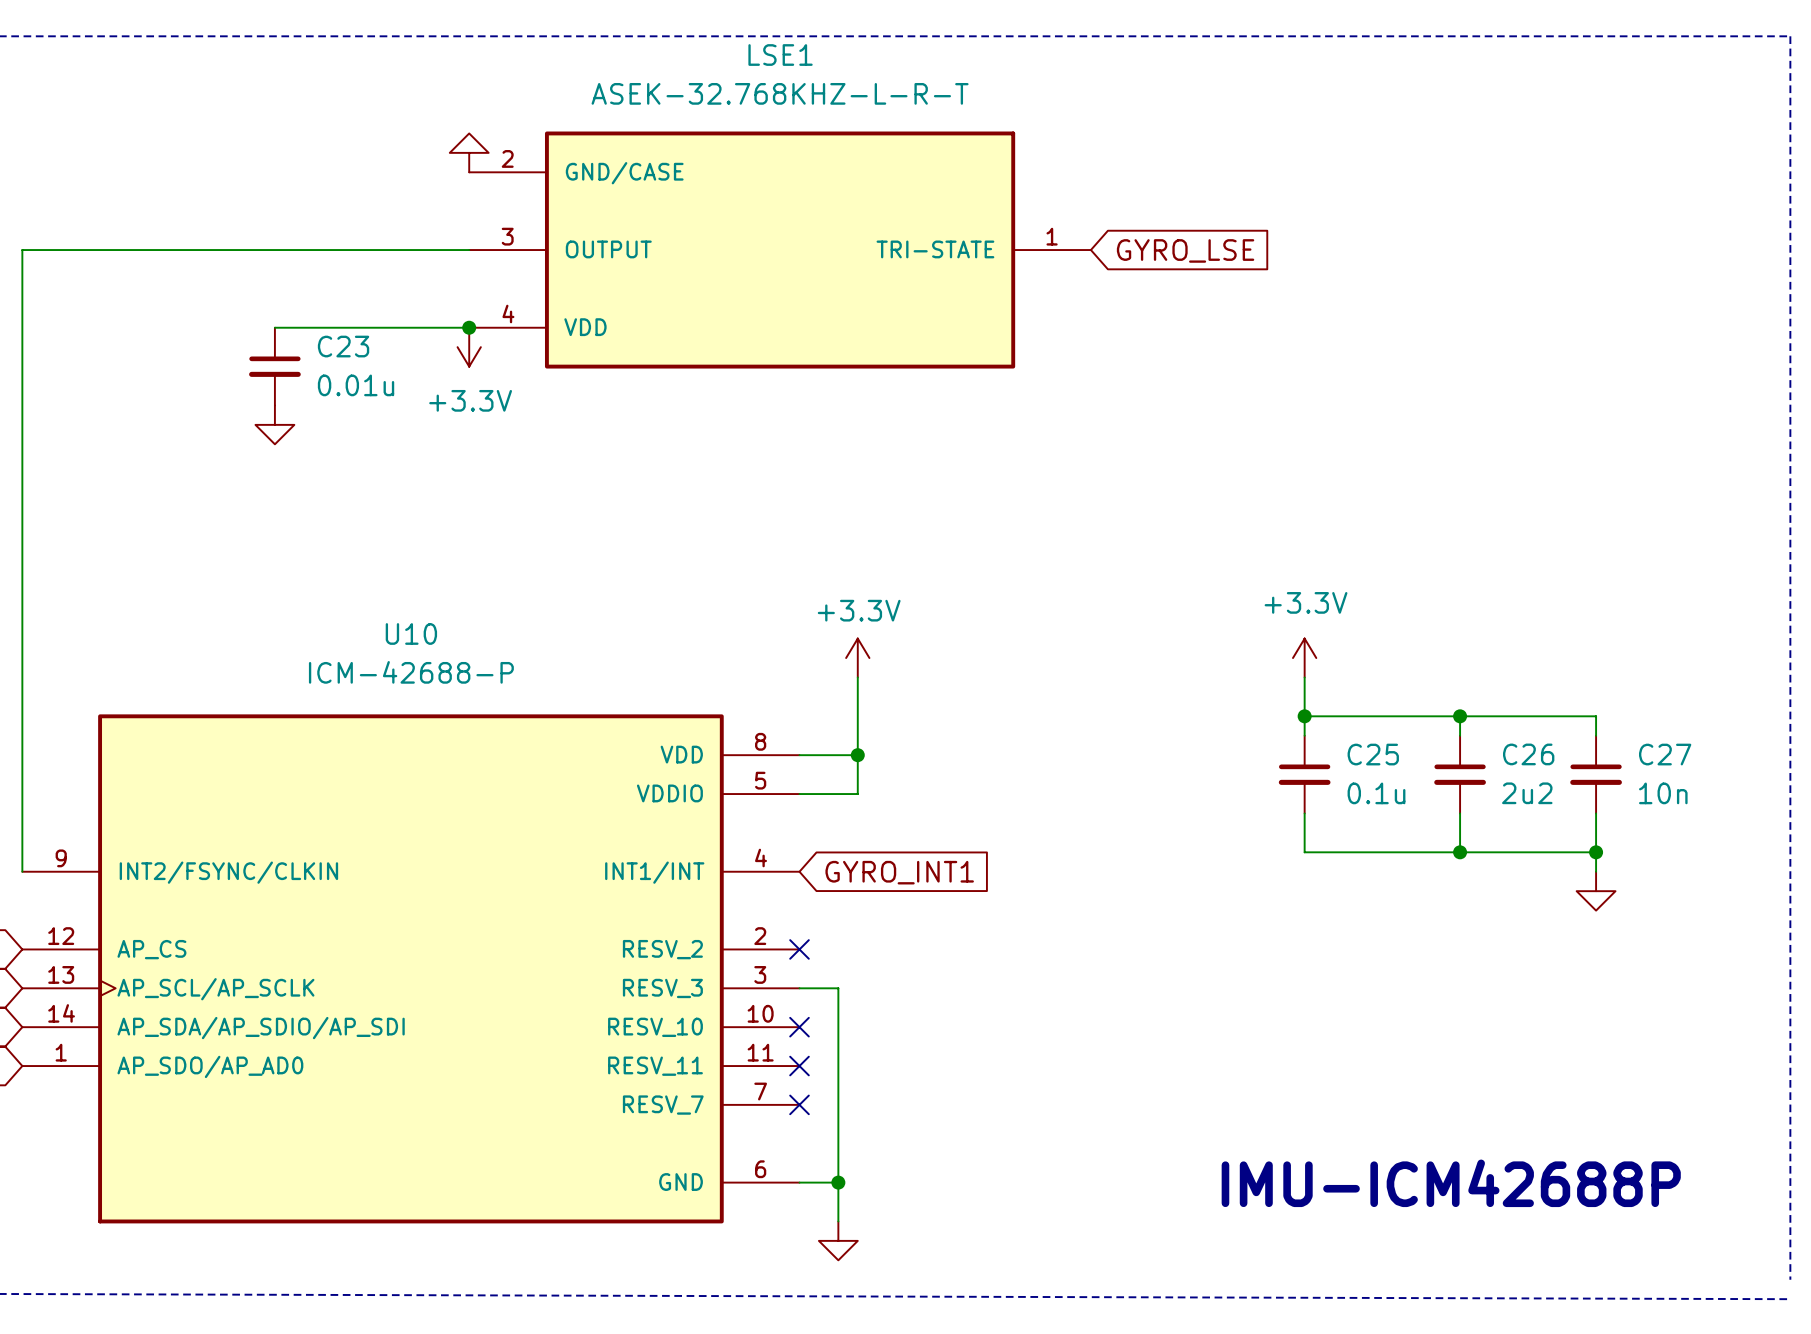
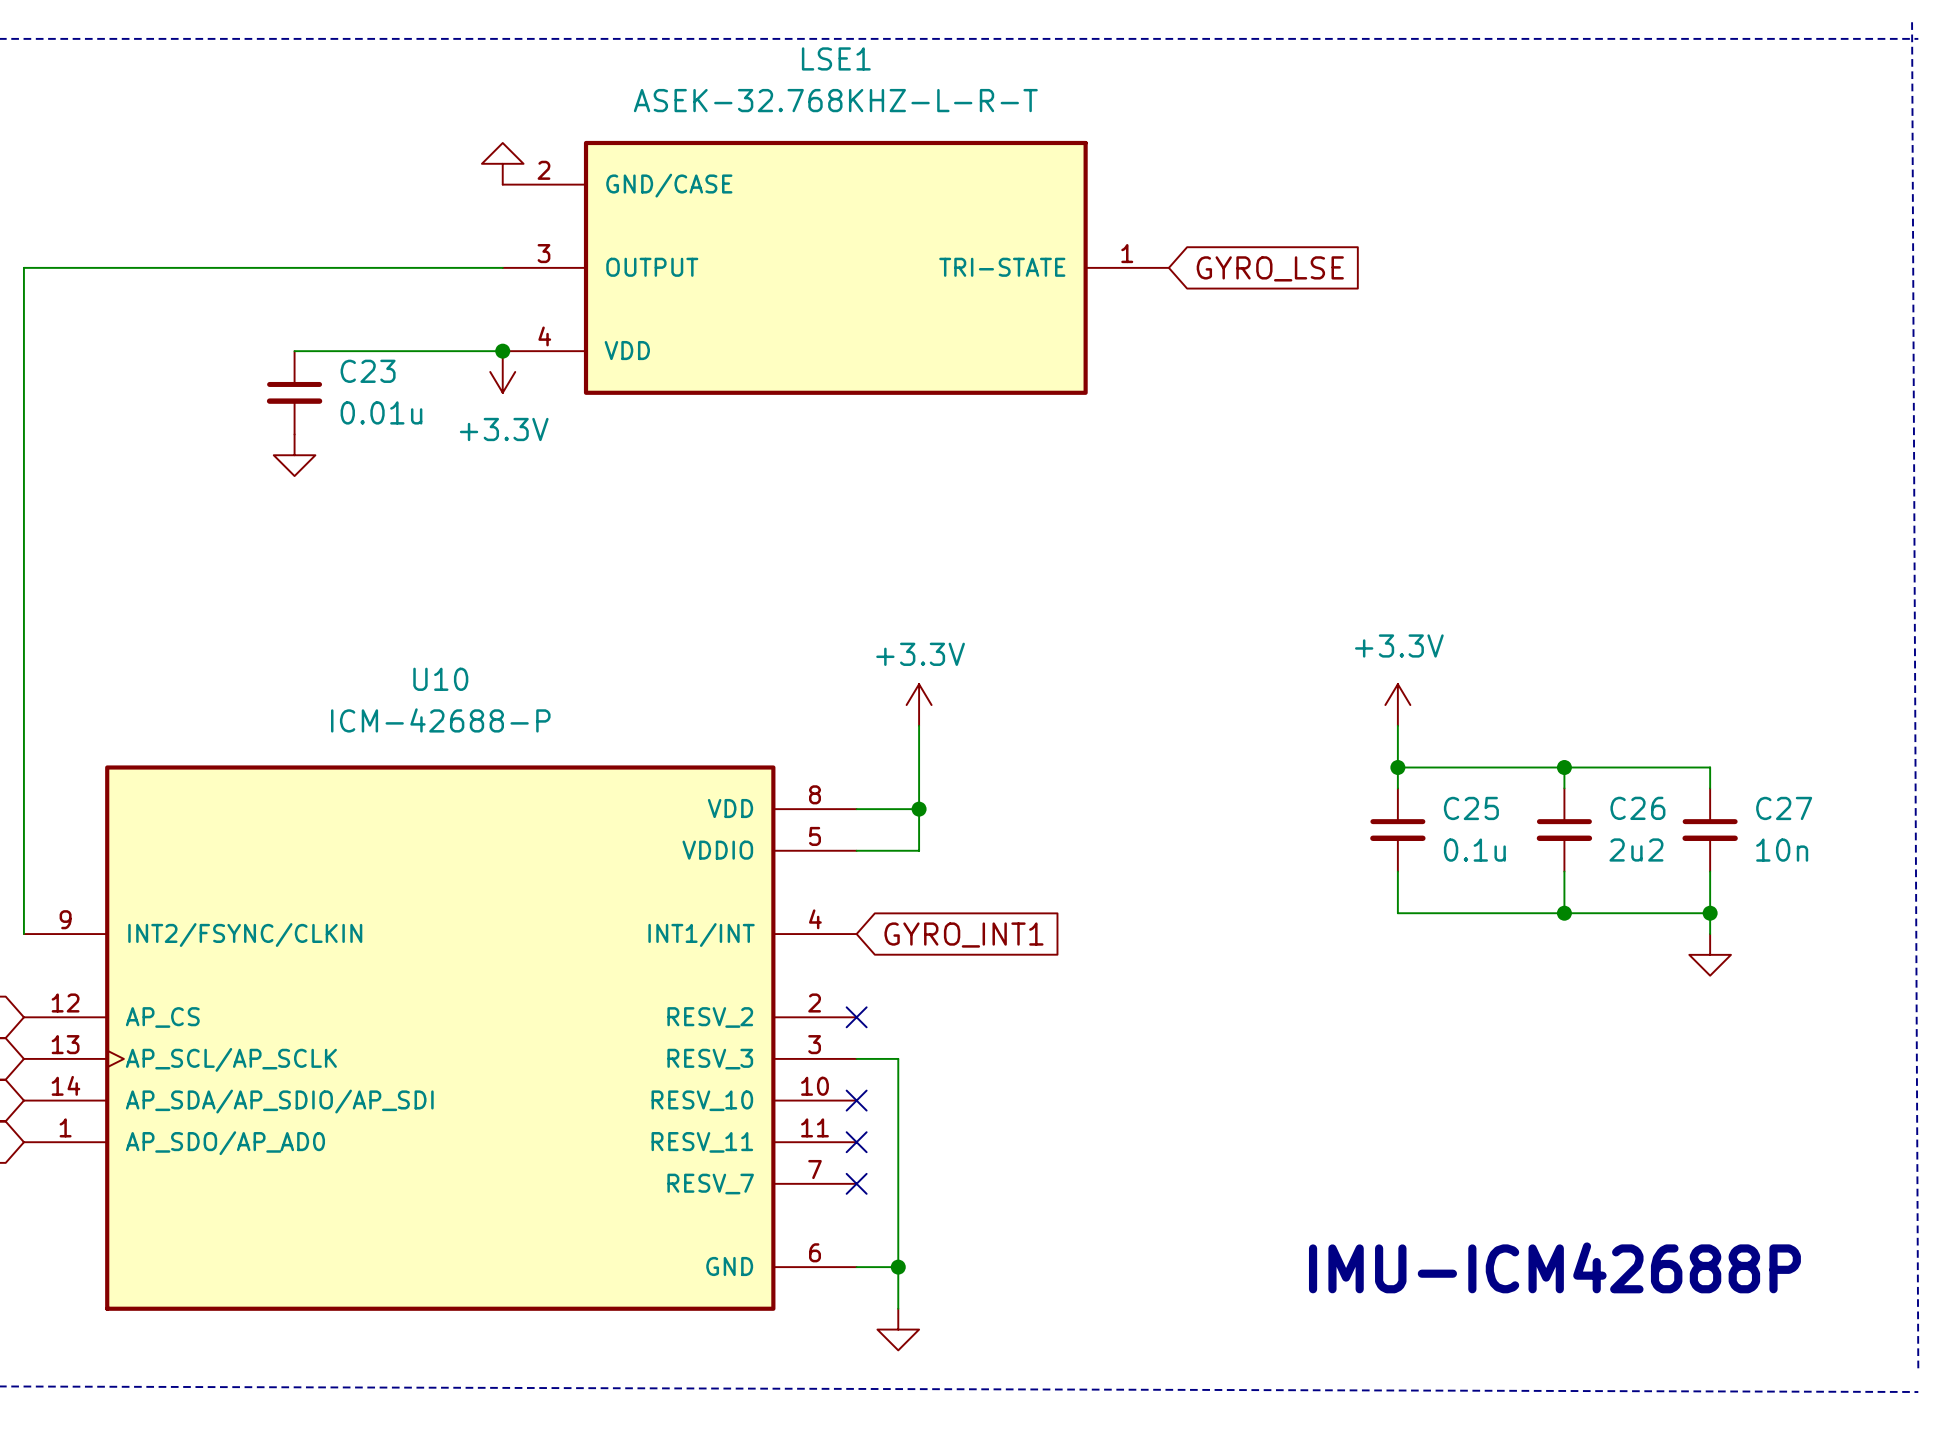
line: (1790, 36) (1790, 1279) -> (1912, 22) (1918, 1371)

